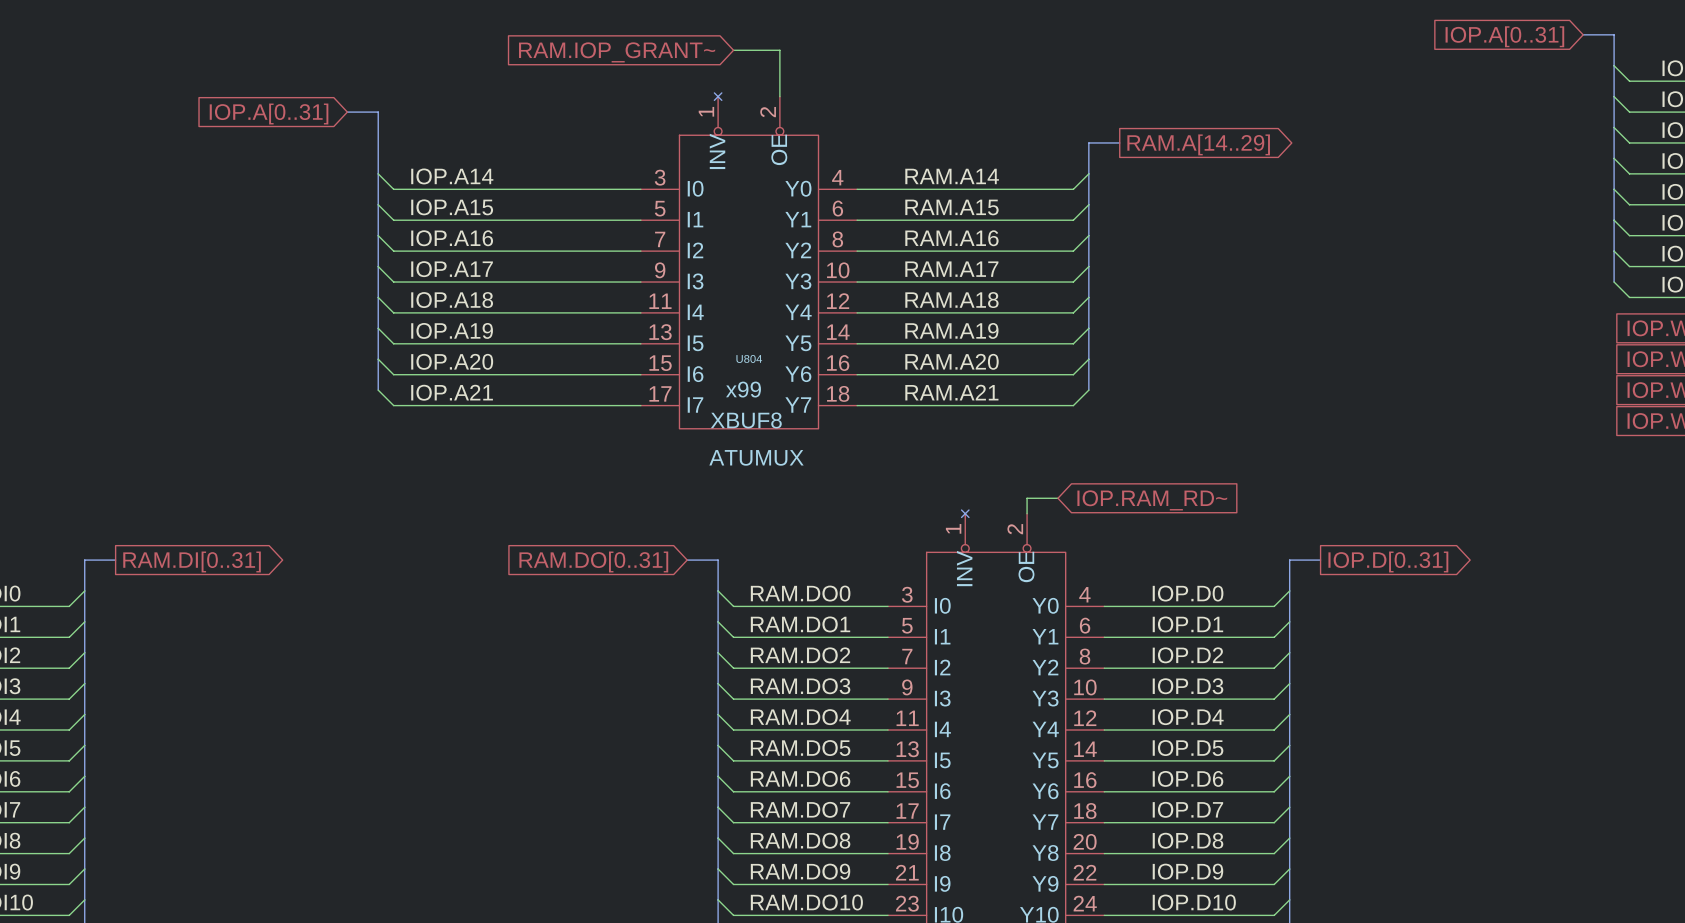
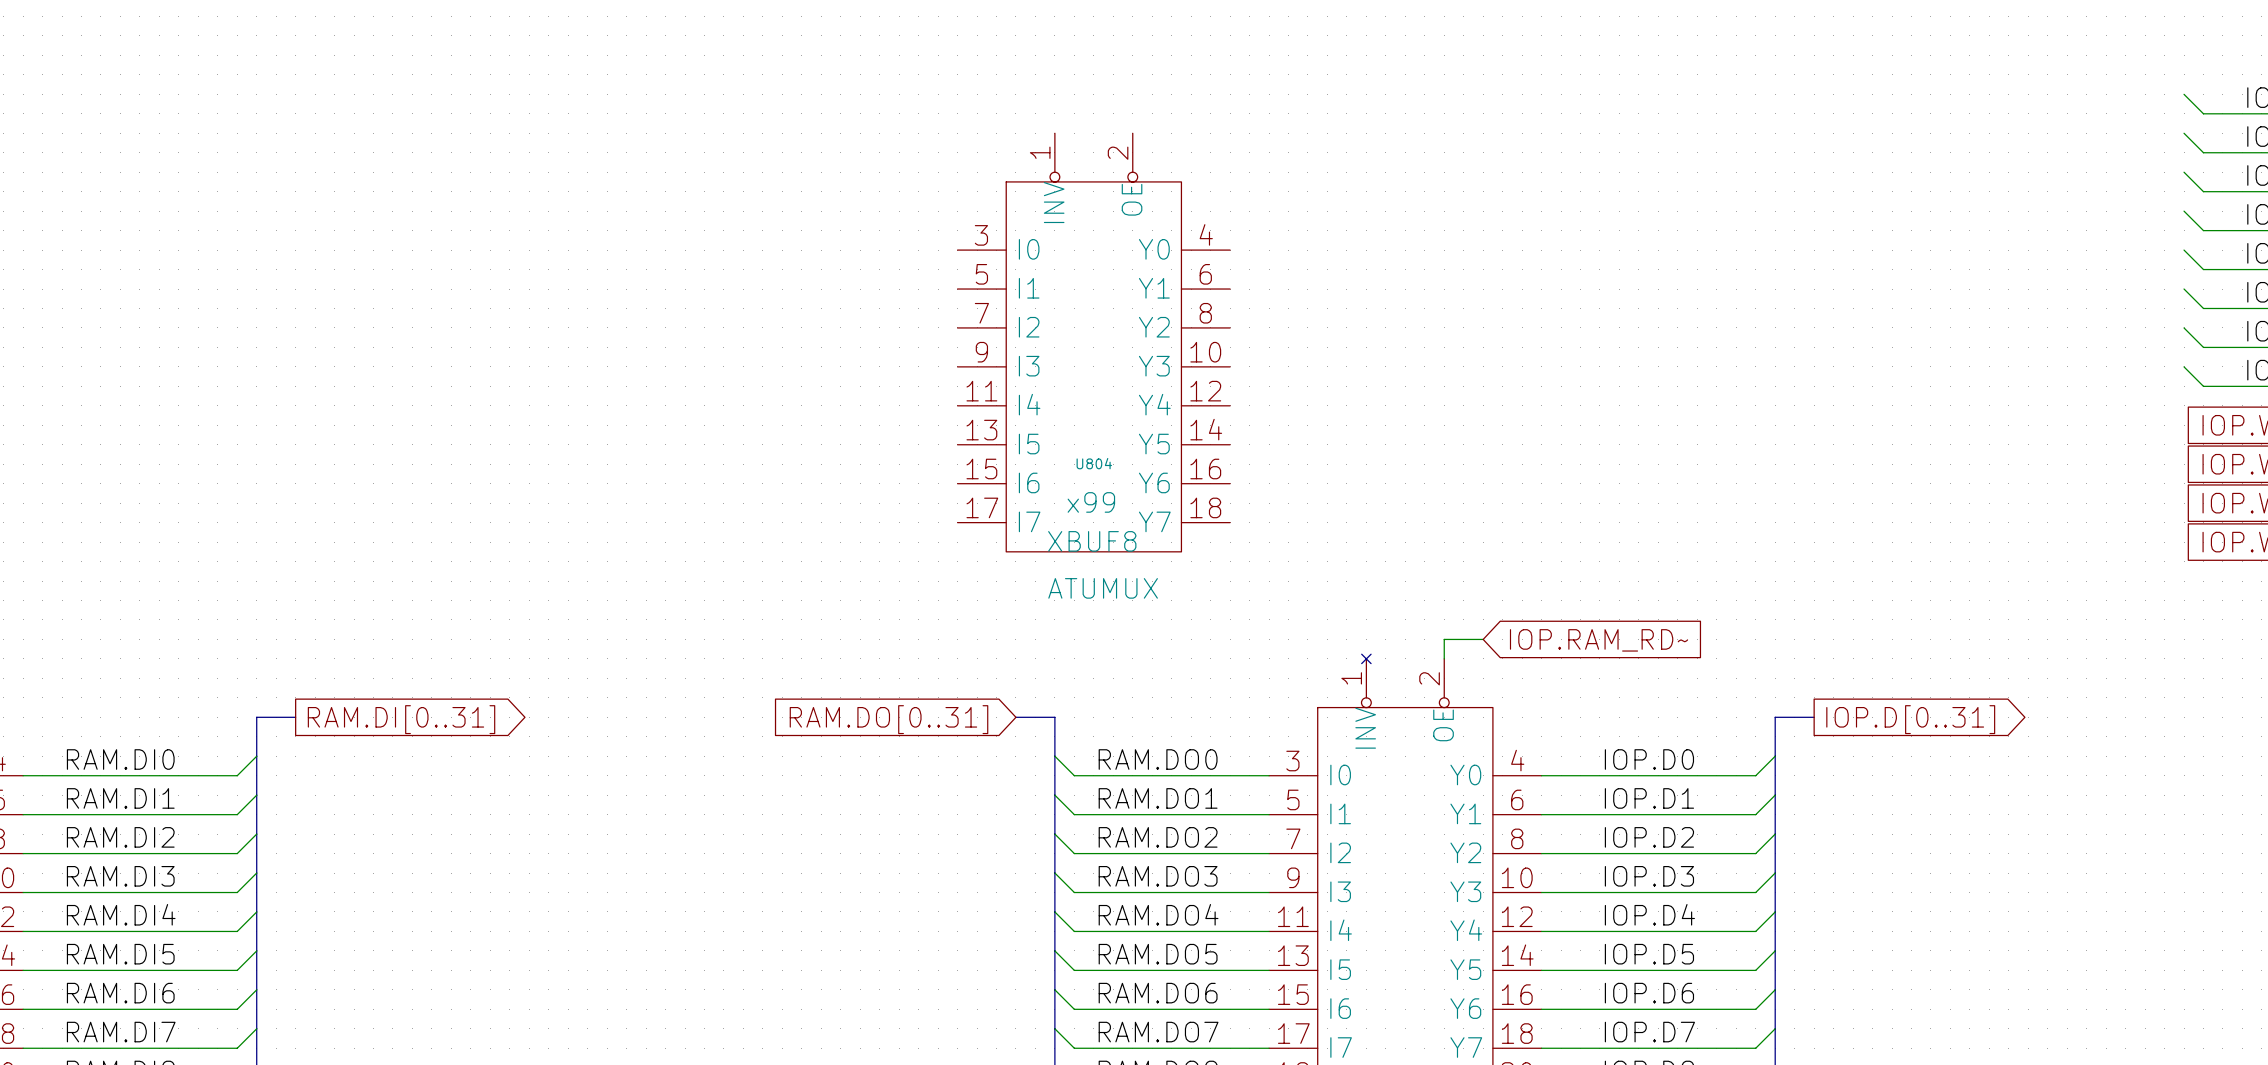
bus: (1583, 34) (1614, 34) (1614, 282) -> none
global label: IOP.A[0..31] (1504, 36) -> none
wire: (733, 50) (779, 50) (779, 96) -> none
global label: RAM.IOP_GRANT~ (617, 52) -> none
no-connect mark: (718, 96) -> none
bus: (347, 112) (378, 112) (378, 390) -> none
global label: IOP.A[0..31] (269, 114) -> none
bus: (1119, 142) (1088, 142) (1088, 390) -> none
global label: RAM.A[14..29] (1198, 144) -> none
wire: (378, 173) (393, 189) (640, 189) -> none
wire: (1088, 173) (1073, 189) (857, 189) -> none
label: IOP.A14 (452, 176) -> none
label: RAM.A14 (952, 176) -> none
wire: (378, 204) (393, 220) (640, 220) -> none
wire: (1088, 204) (1073, 220) (857, 220) -> none
label: IOP.A15 (452, 207) -> none
label: RAM.A15 (951, 207) -> none
wire: (378, 235) (393, 251) (640, 251) -> none
wire: (1088, 235) (1073, 251) (857, 251) -> none
label: IOP.A16 (452, 238) -> none
label: RAM.A16 (951, 238) -> none
wire: (378, 266) (393, 282) (640, 282) -> none
wire: (1088, 266) (1073, 282) (857, 282) -> none
label: IOP.A17 (452, 269) -> none
label: RAM.A17 (951, 269) -> none
wire: (378, 297) (393, 312) (640, 312) -> none
wire: (1088, 297) (1073, 312) (857, 312) -> none
label: IOP.A18 (452, 300) -> none
label: RAM.A18 (951, 300) -> none
wire: (378, 328) (393, 343) (640, 343) -> none
wire: (1088, 328) (1073, 343) (857, 343) -> none
label: IOP.A19 (452, 330) -> none
label: RAM.A19 (951, 330) -> none
wire: (378, 359) (393, 374) (640, 374) -> none
wire: (1088, 359) (1073, 374) (857, 374) -> none
label: IOP.A20 (452, 361) -> none
label: RAM.A20 (952, 361) -> none
wire: (378, 390) (393, 405) (640, 405) -> none
wire: (1088, 390) (1073, 405) (857, 405) -> none
label: IOP.A21 (452, 392) -> none
label: RAM.A21 (951, 392) -> none

